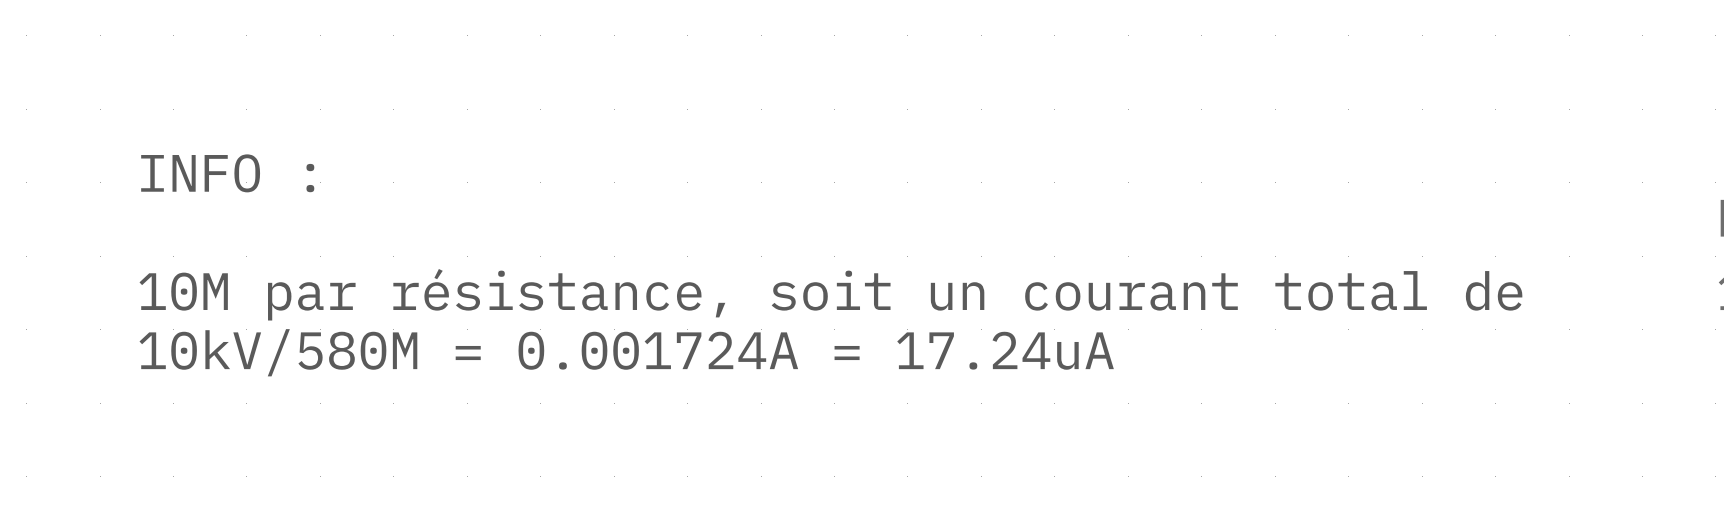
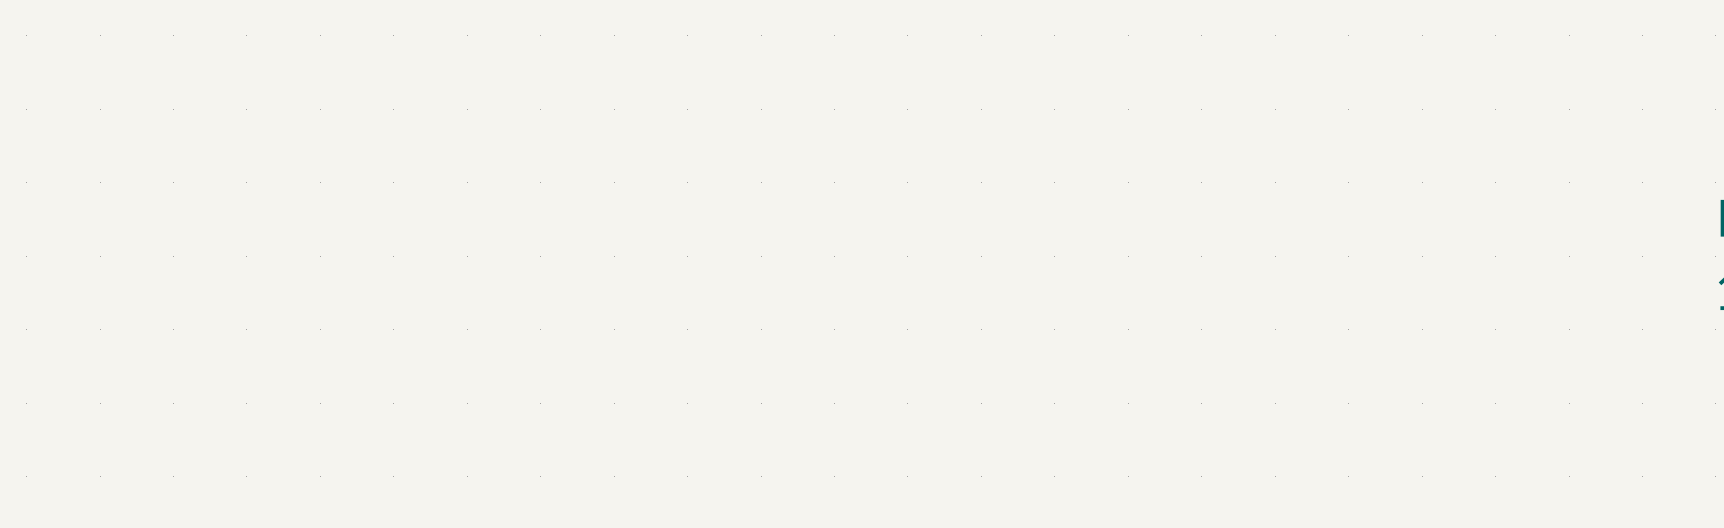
text: INFO : (227, 173) -> none
text: 10M par résistance, soit un courant total de (830, 294) -> none
text: 10kV/580M = 0.001724A = 17.24uA (626, 352) -> none

